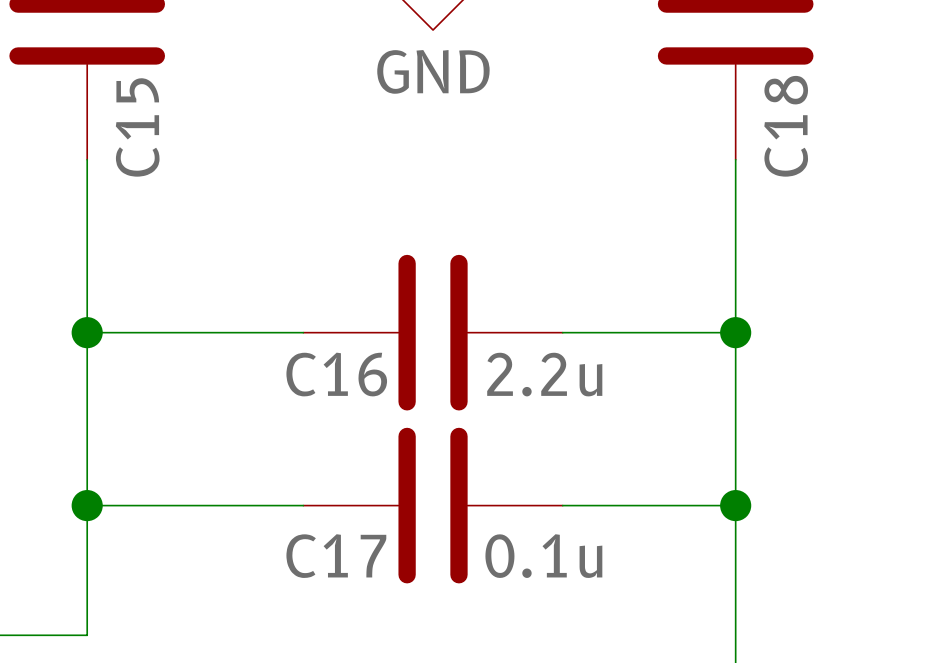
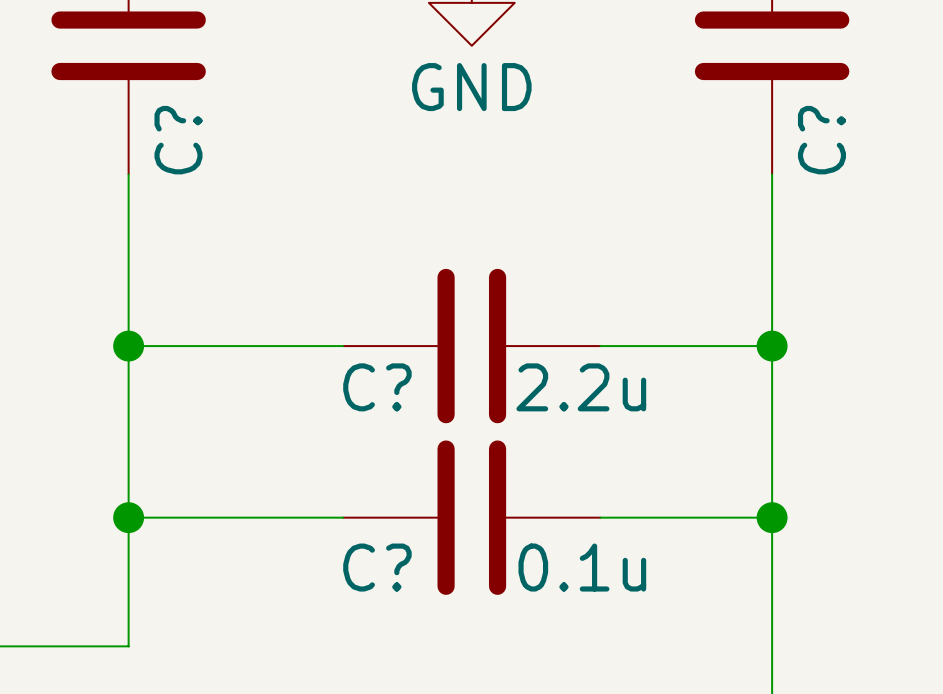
C18 name: C18 (786, 126) -> C? (821, 140)
C15 name: C15 (137, 127) -> C? (178, 140)
C16 name: C16 (336, 374) -> C? (377, 387)
C17 name: C17 (336, 556) -> C? (377, 567)

